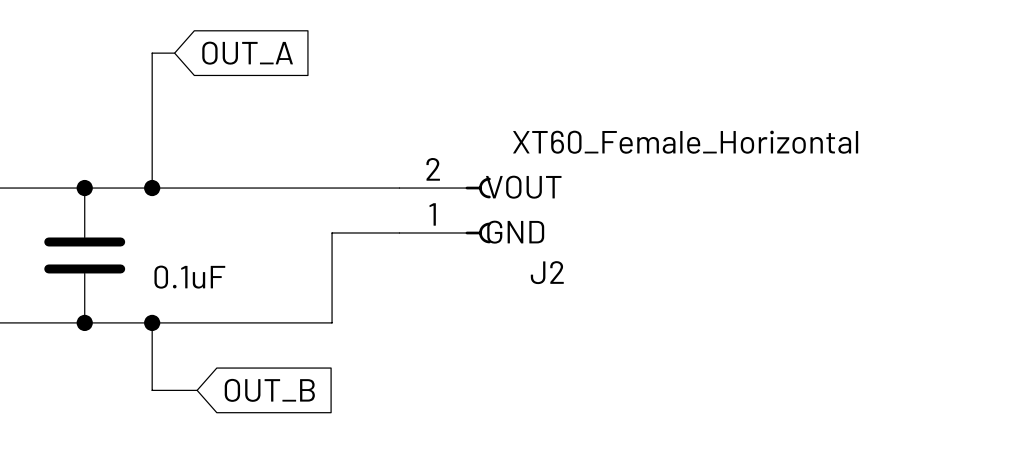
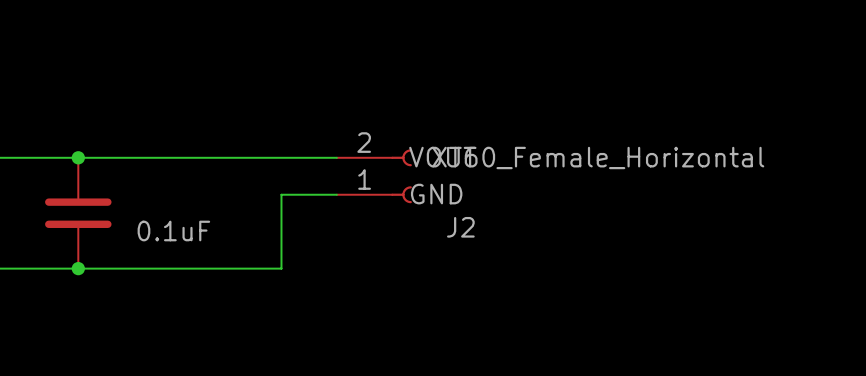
wire: (174, 53) (152, 53) (152, 188) -> none
global label: OUT_A (247, 53) -> none
J2 value position: XT60_Female_Horizontal (685, 142) -> XT60_Female_Horizontal (598, 157)
junction: (152, 188) -> none
wire: (152, 322) (152, 390) (197, 390) -> none
junction: (152, 322) -> none
global label: OUT_B (269, 390) -> none

